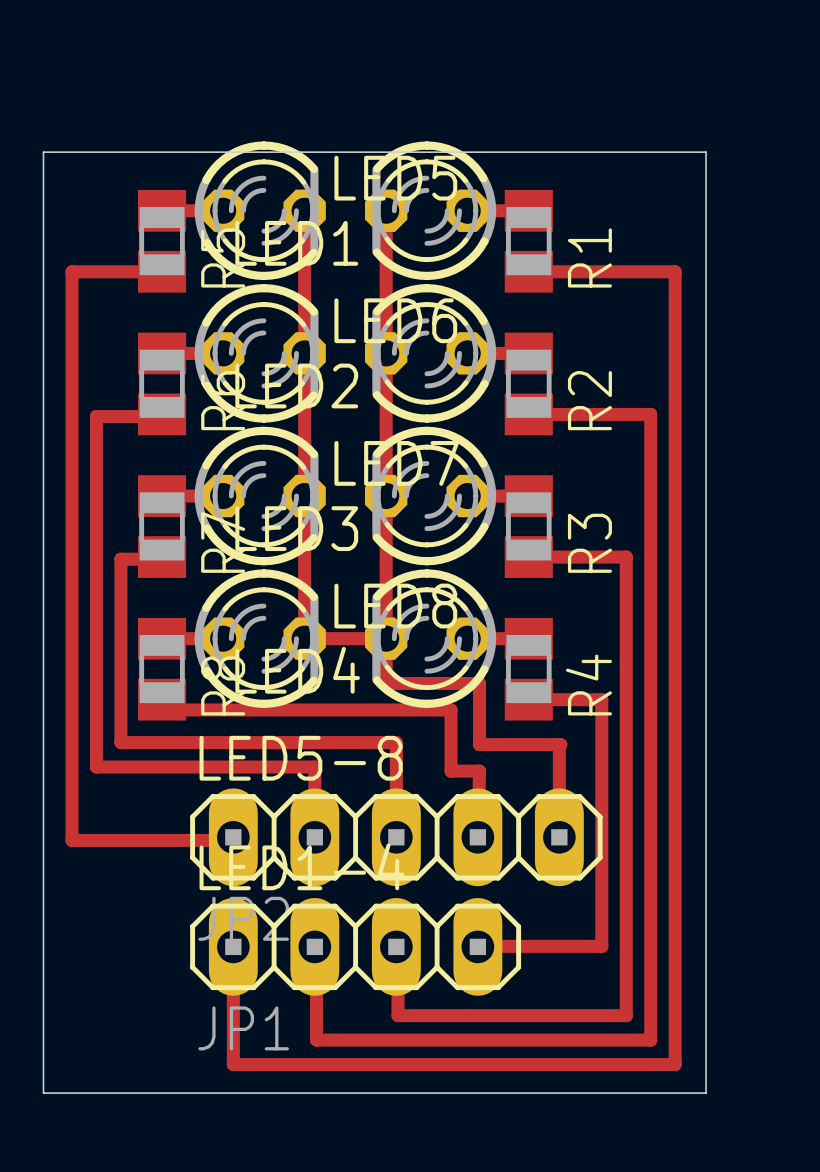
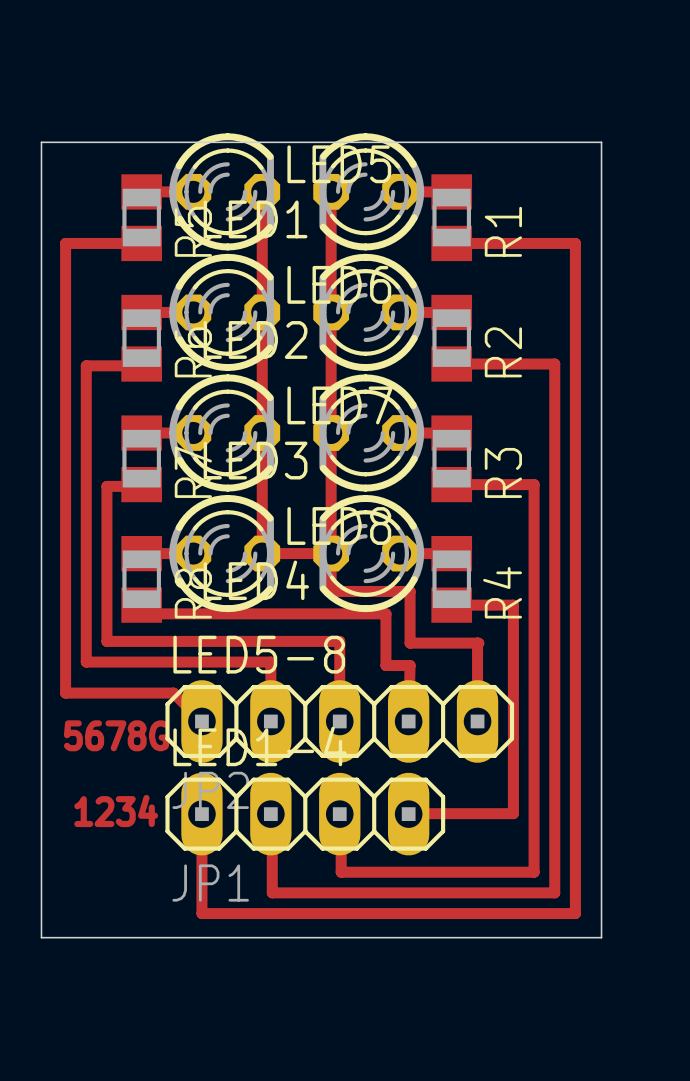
top track: (72, 803) (72, 840) (233, 840) (233, 837) -> (65, 693) (173, 693) (201, 721)
text: none -> 5678G (116, 735)
text: none -> 1234 (116, 811)

